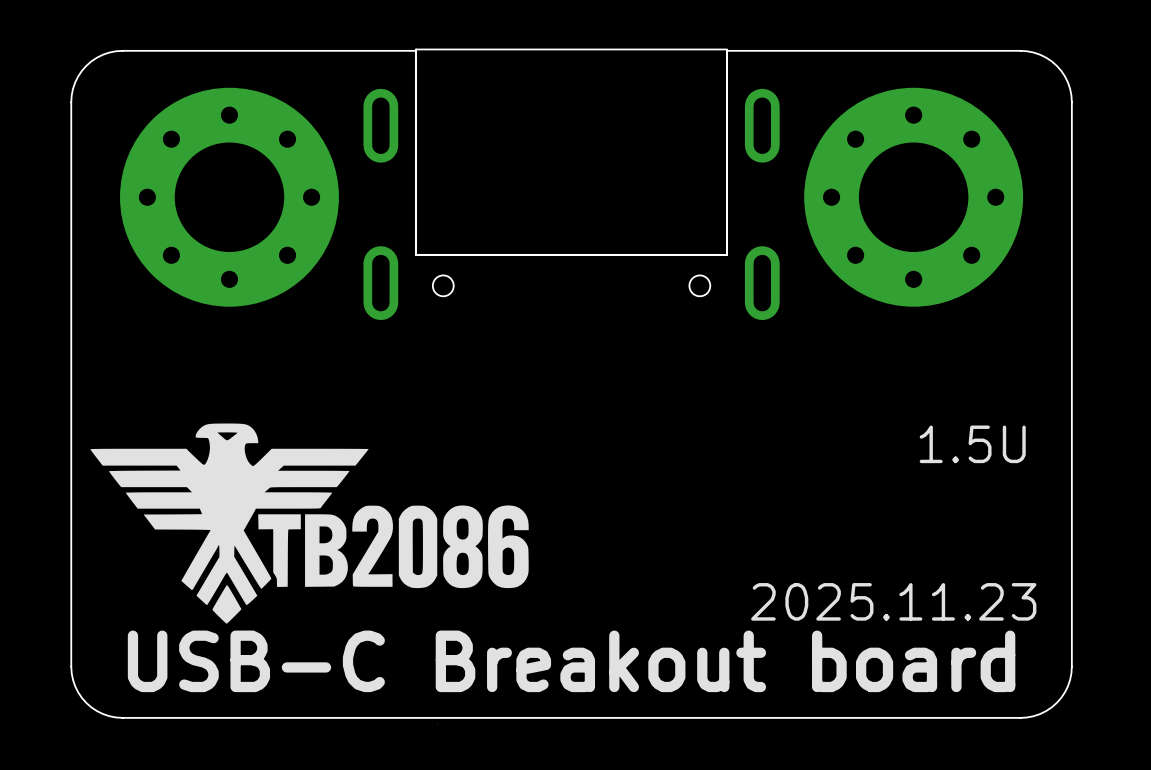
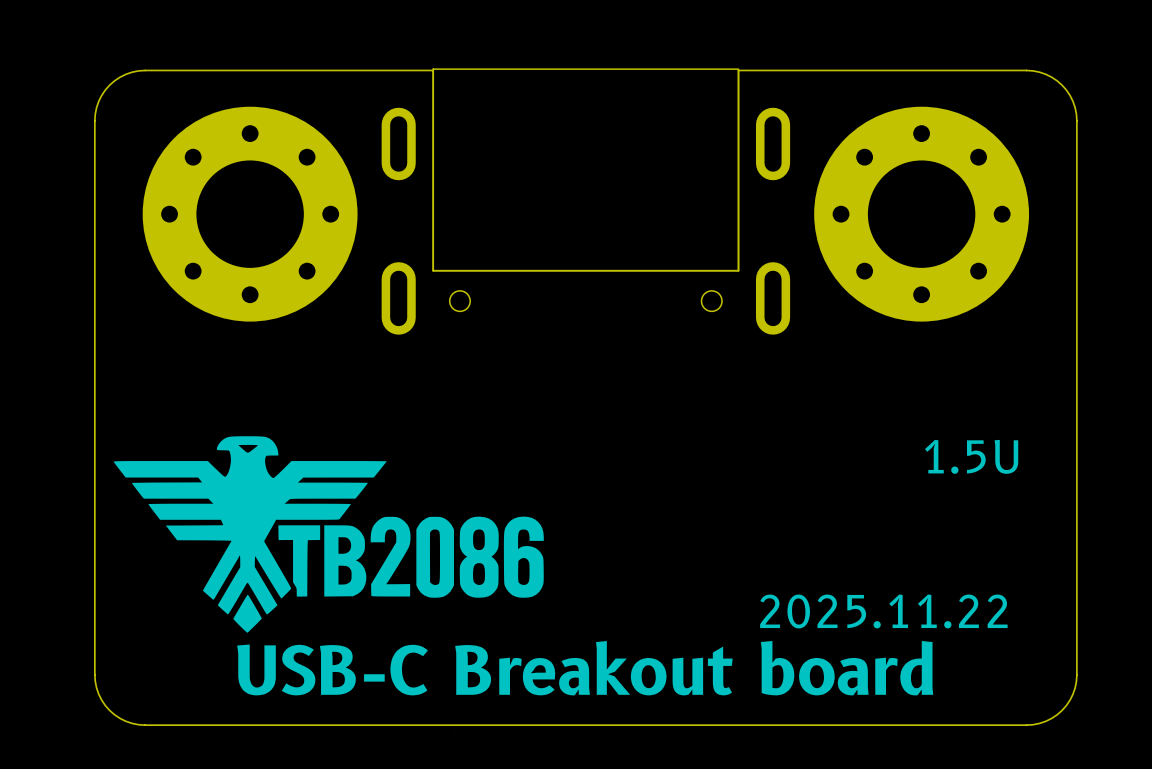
text: 2025.11.23 (893, 601) -> 2025.11.22 (883, 611)

